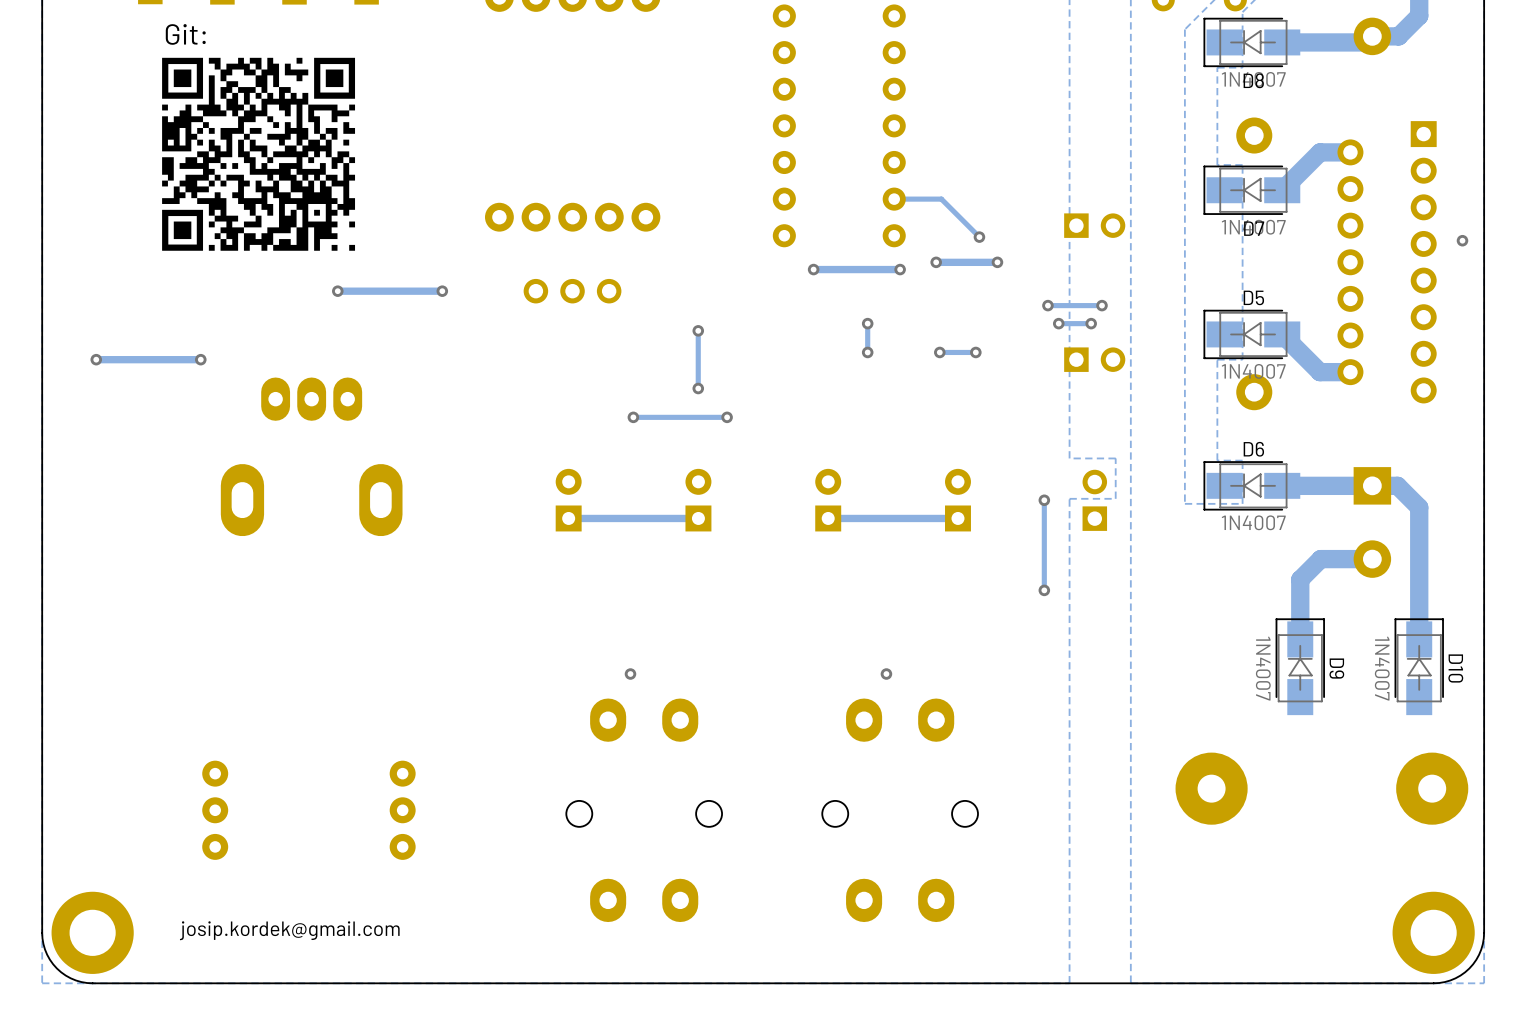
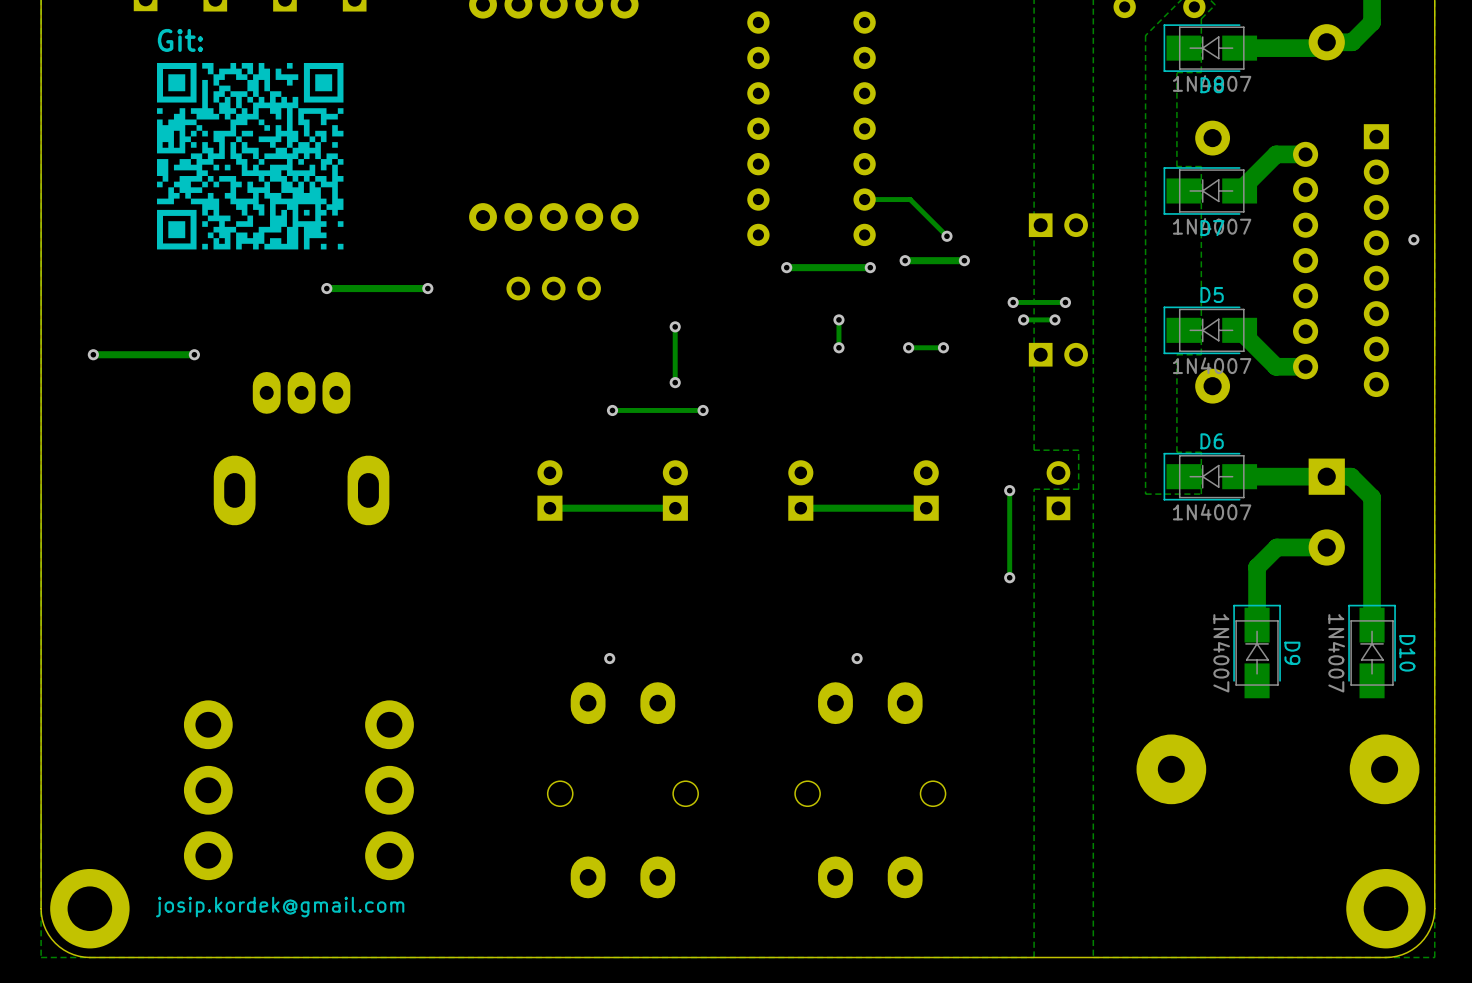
part footprint: [202, 760, 229, 860] -> [183, 700, 233, 881]
part footprint: [389, 760, 416, 860] -> [365, 700, 414, 881]

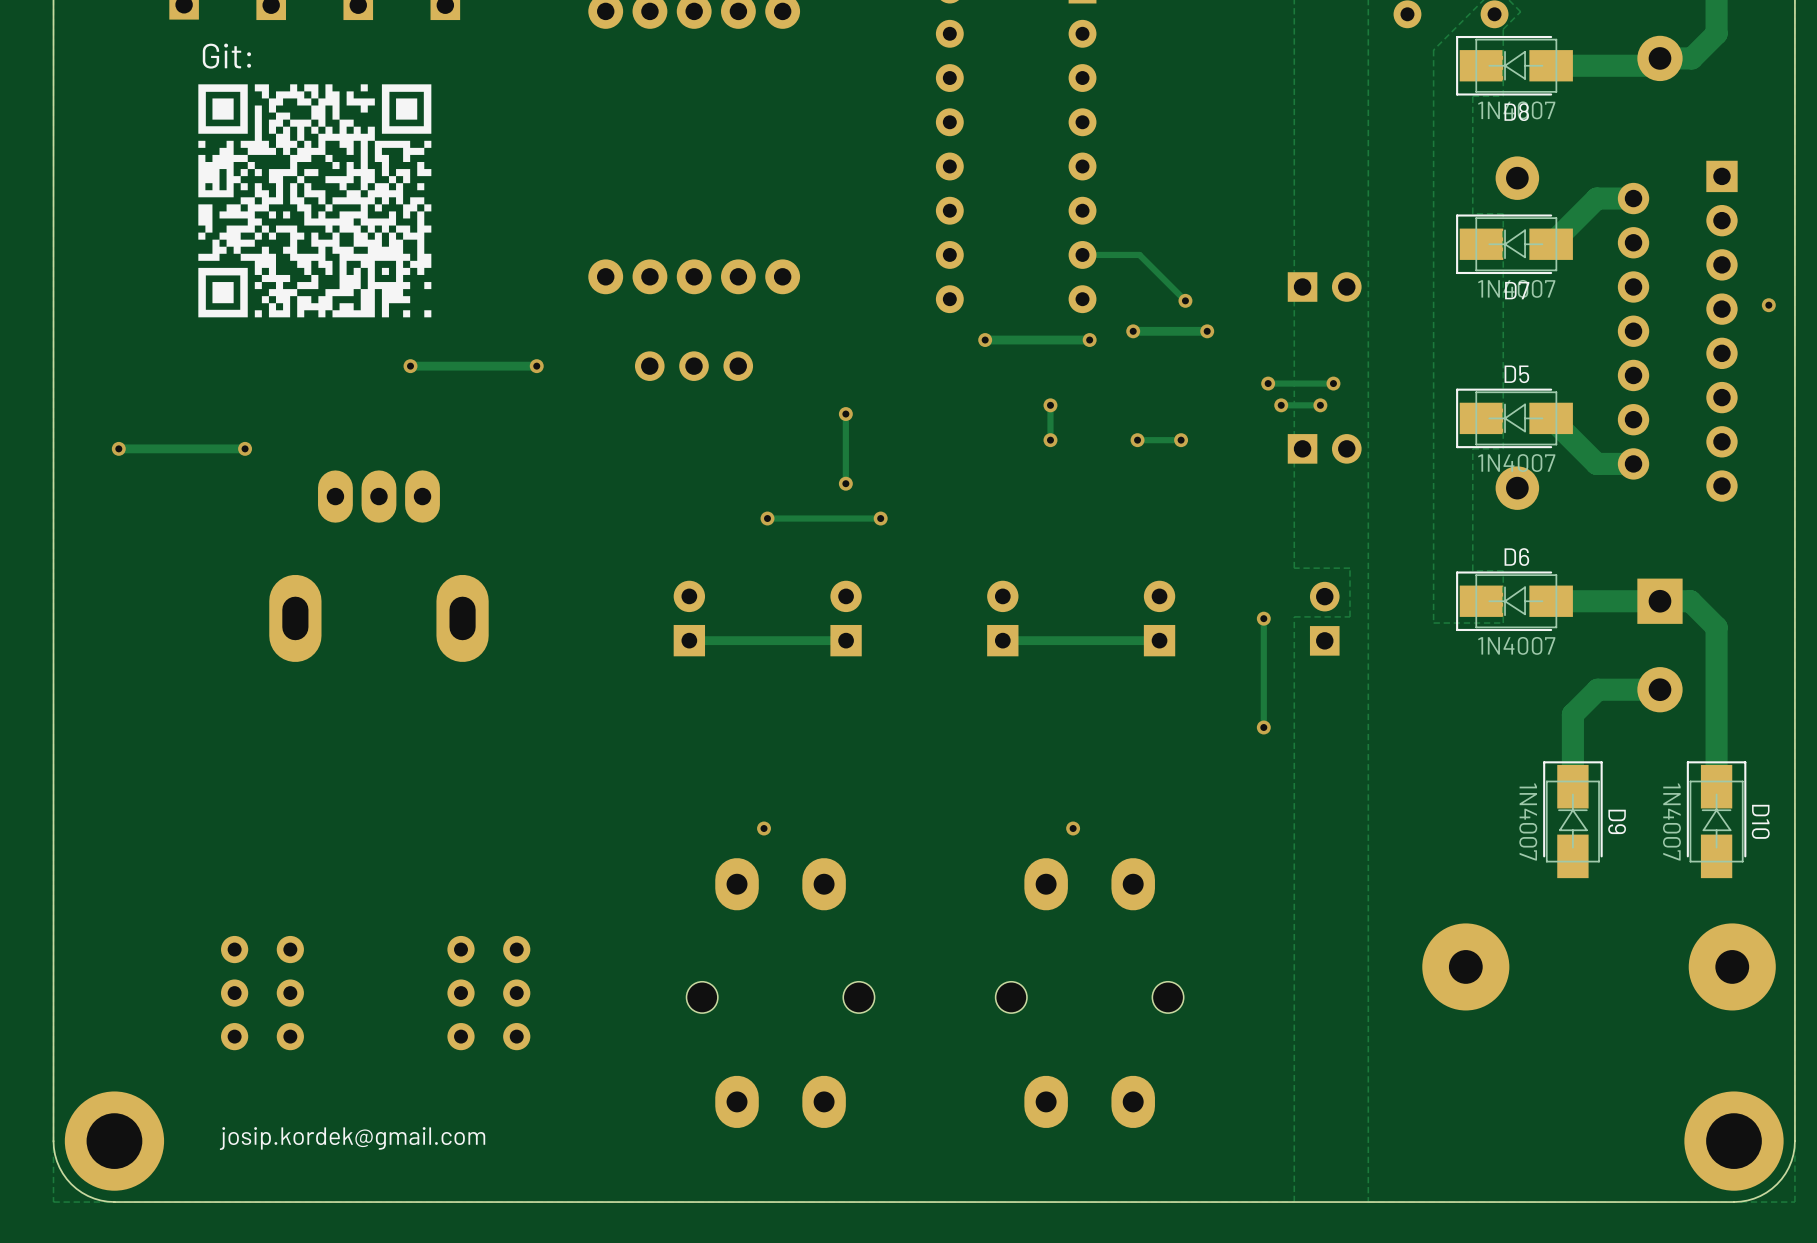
part footprint: [183, 700, 233, 881] -> [221, 935, 304, 1051]
part footprint: [365, 700, 414, 881] -> [447, 935, 531, 1051]

